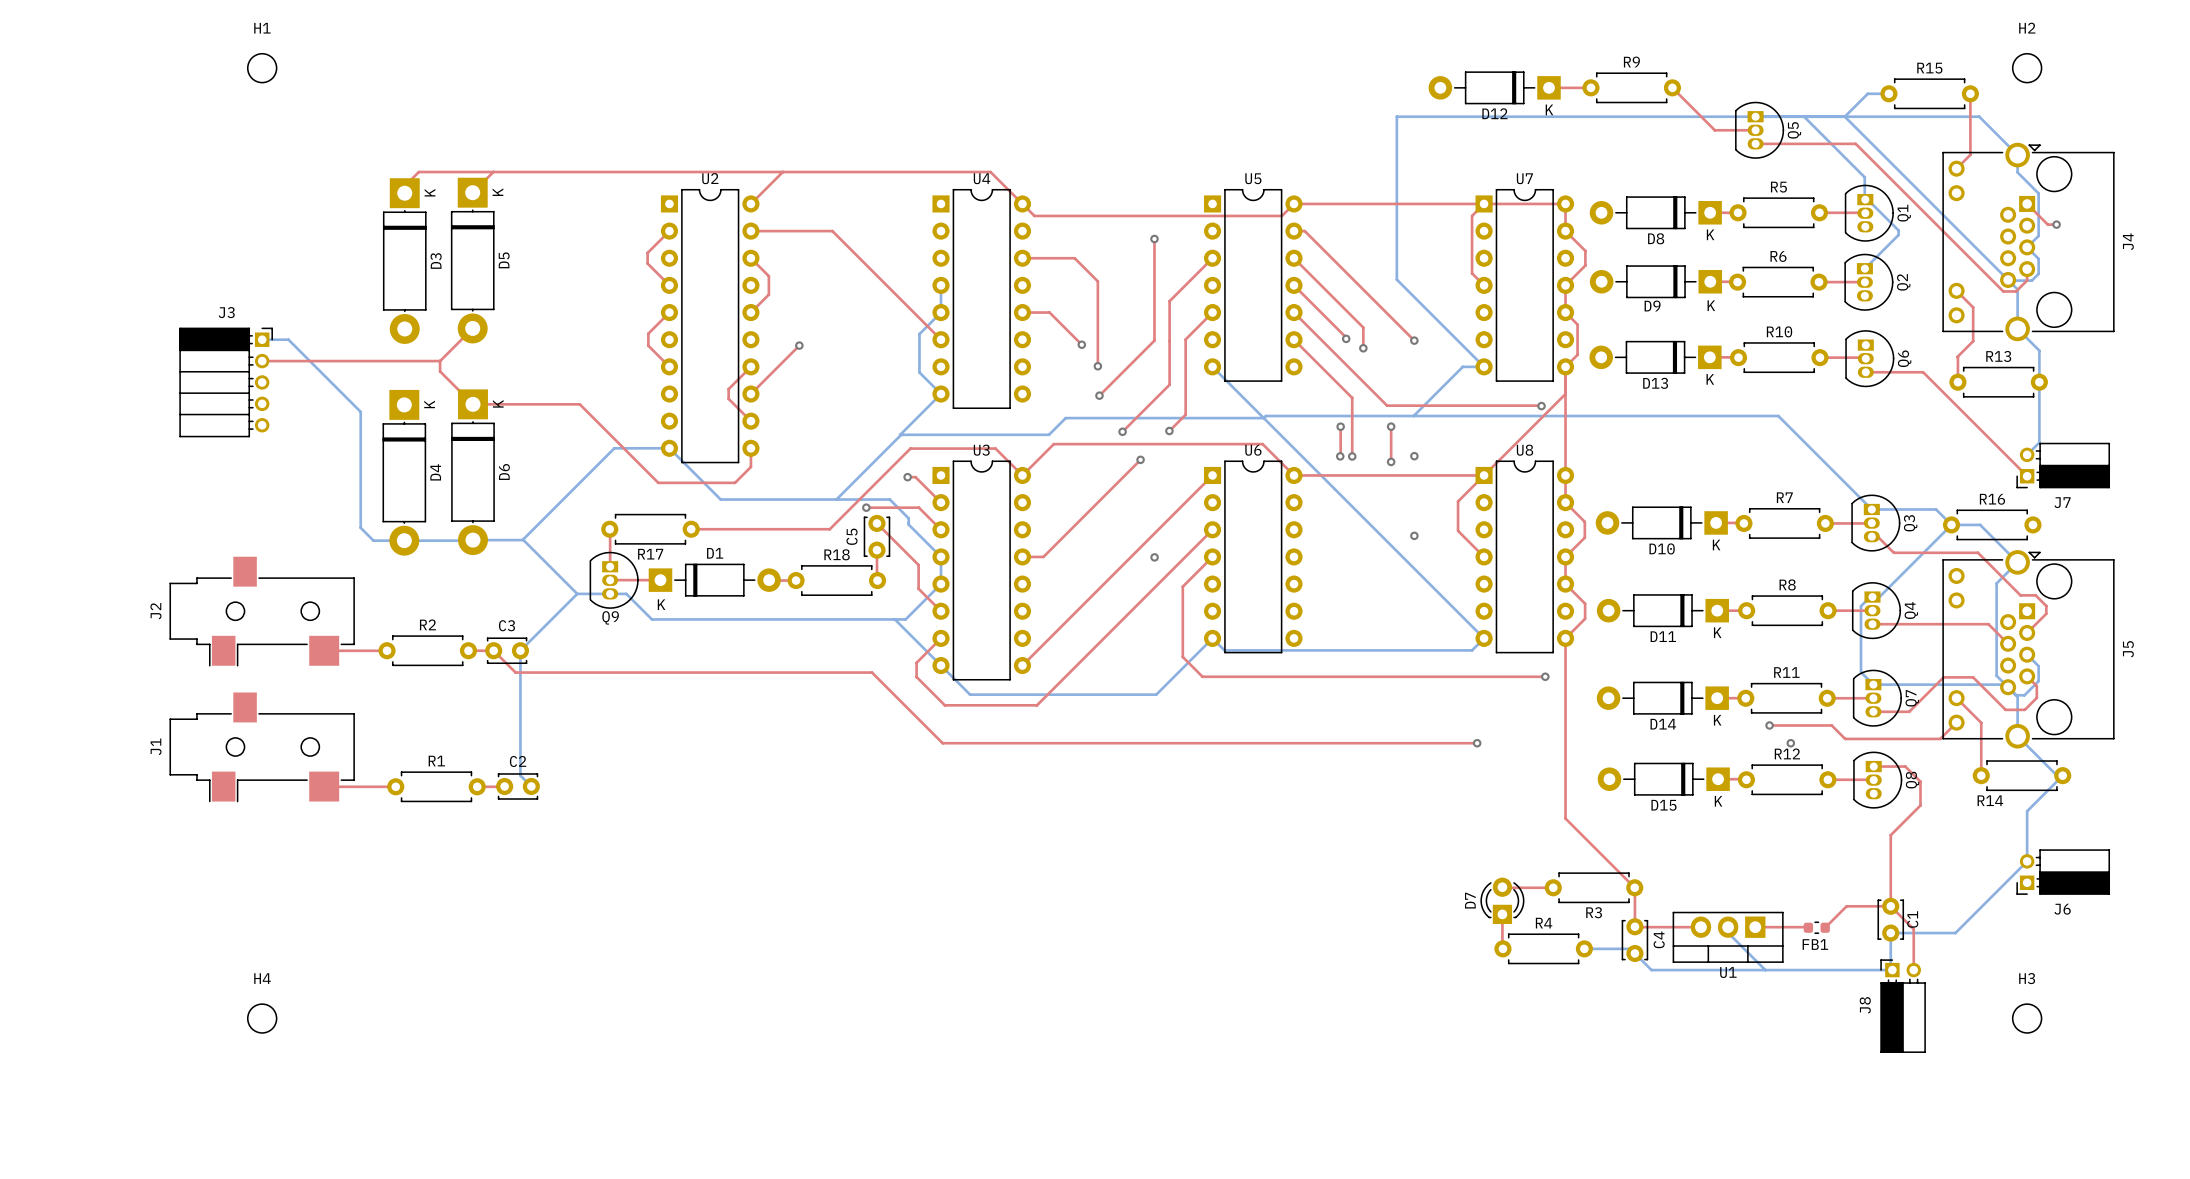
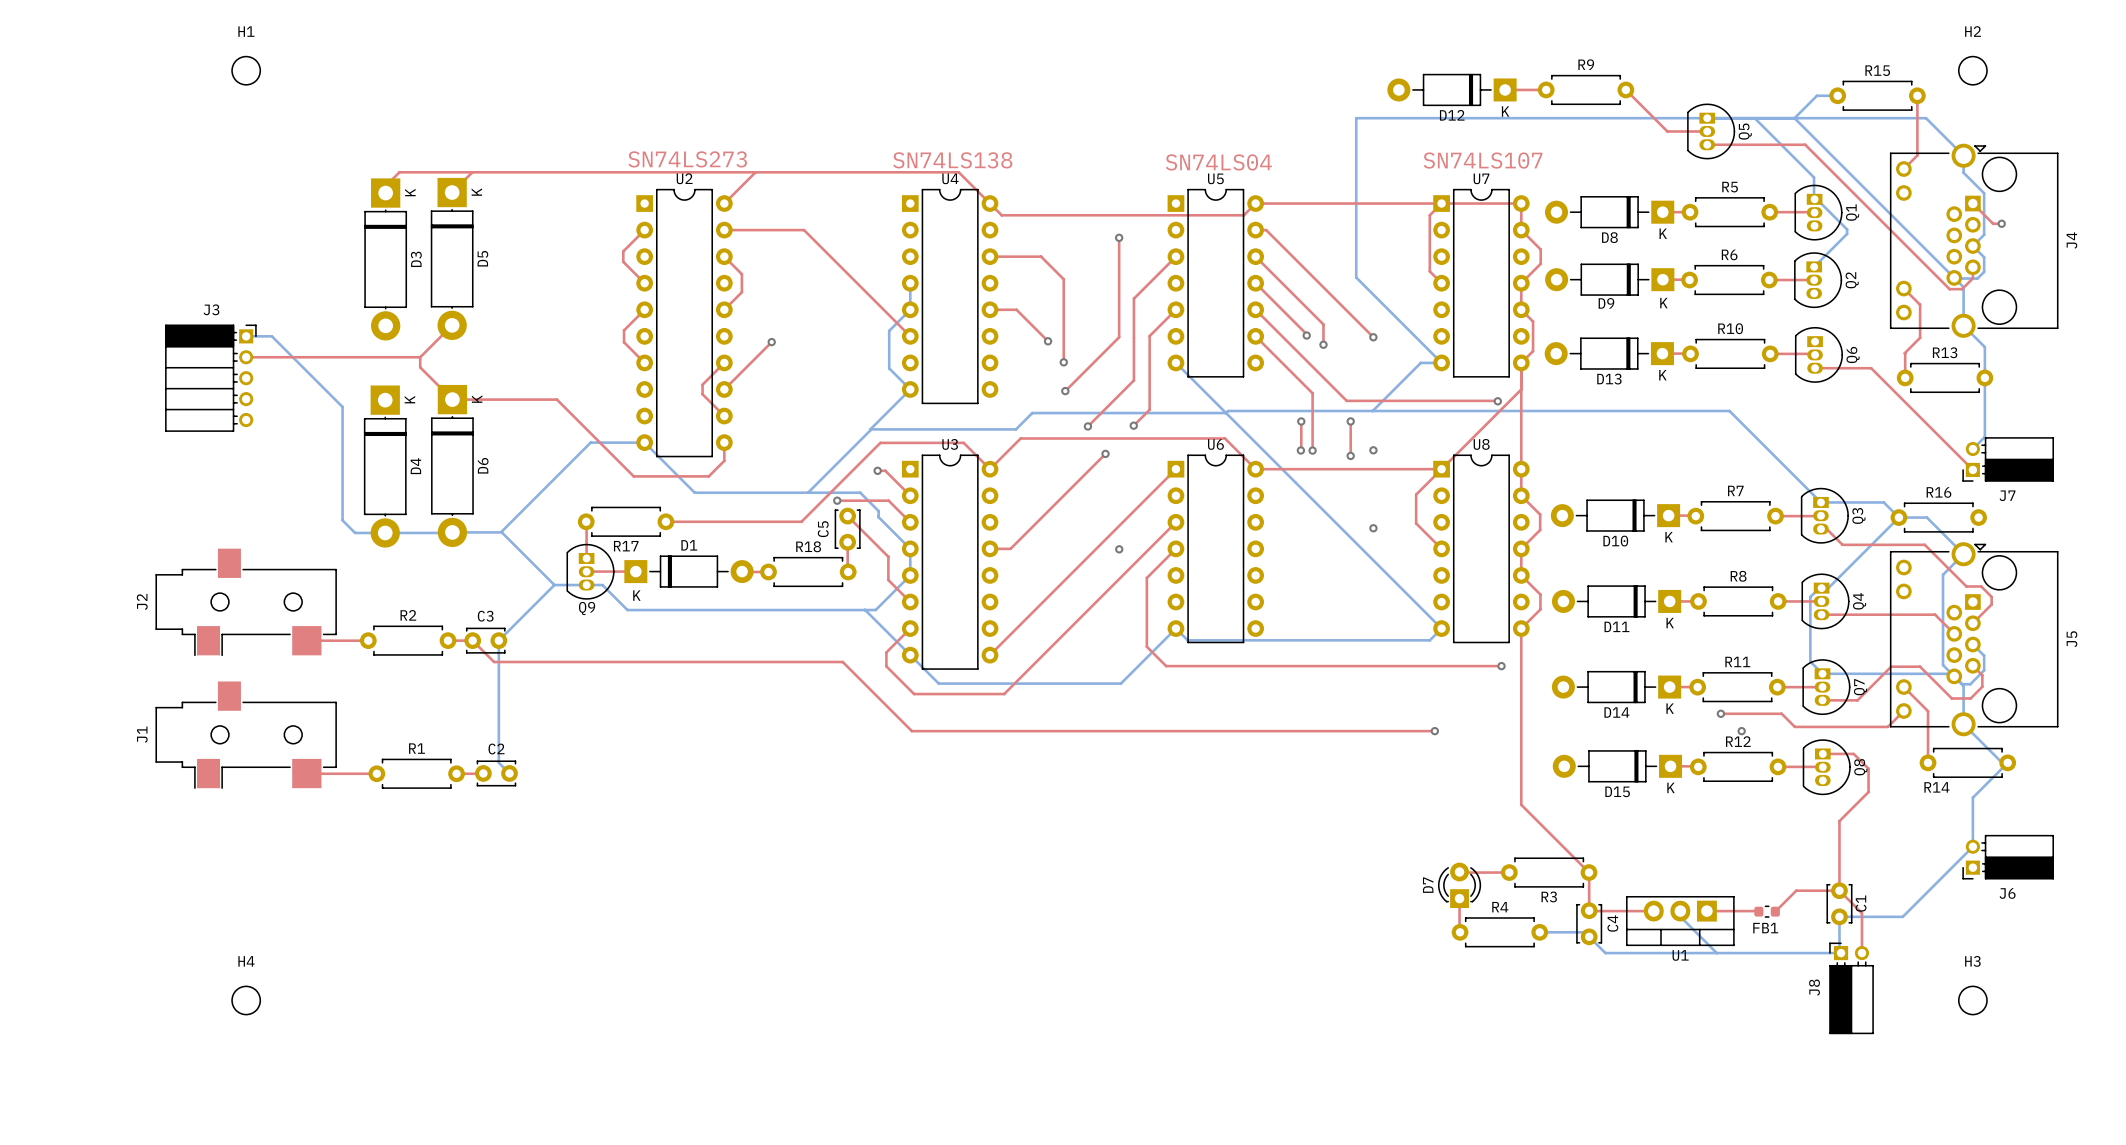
text: none -> SN74LS273 (687, 159)
text: none -> SN74LS138 (952, 160)
text: none -> SN74LS107 (1483, 160)
text: none -> SN74LS04 (1218, 162)

